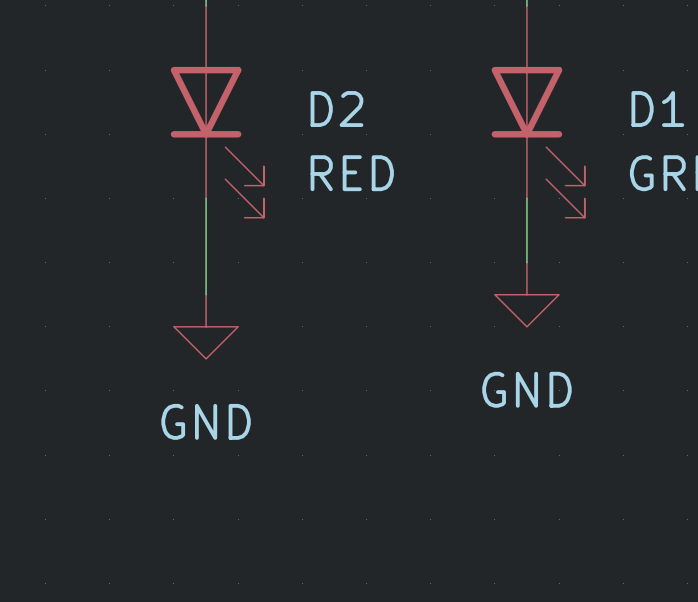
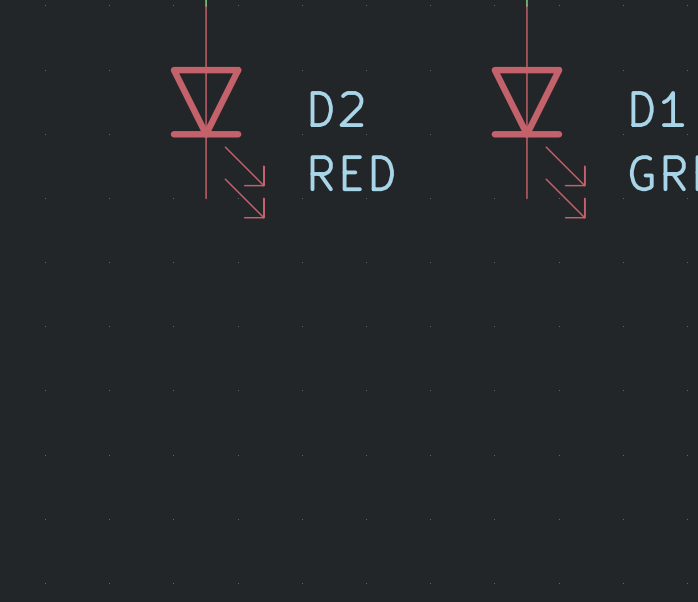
wire: (206, 198) (206, 294) -> none
wire: (526, 198) (526, 262) -> none
power symbol: GND (526, 294) -> none
power symbol: GND (206, 326) -> none

